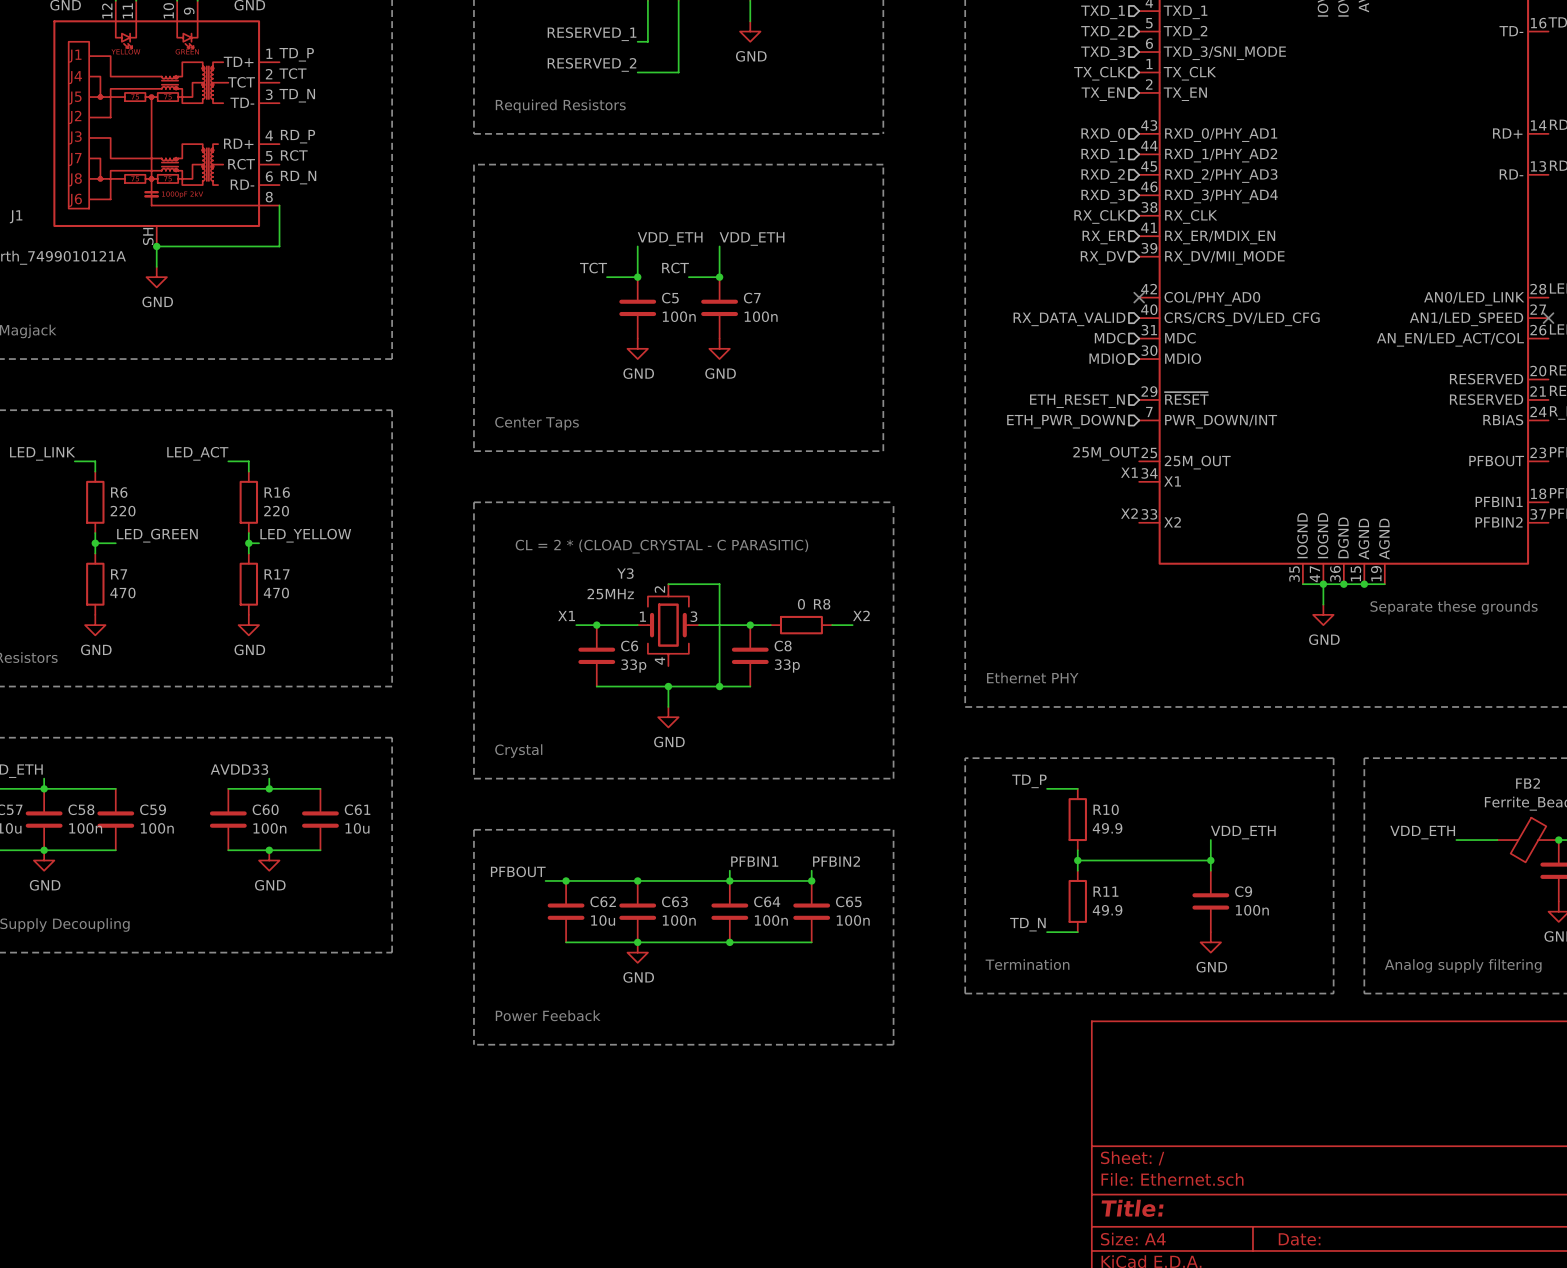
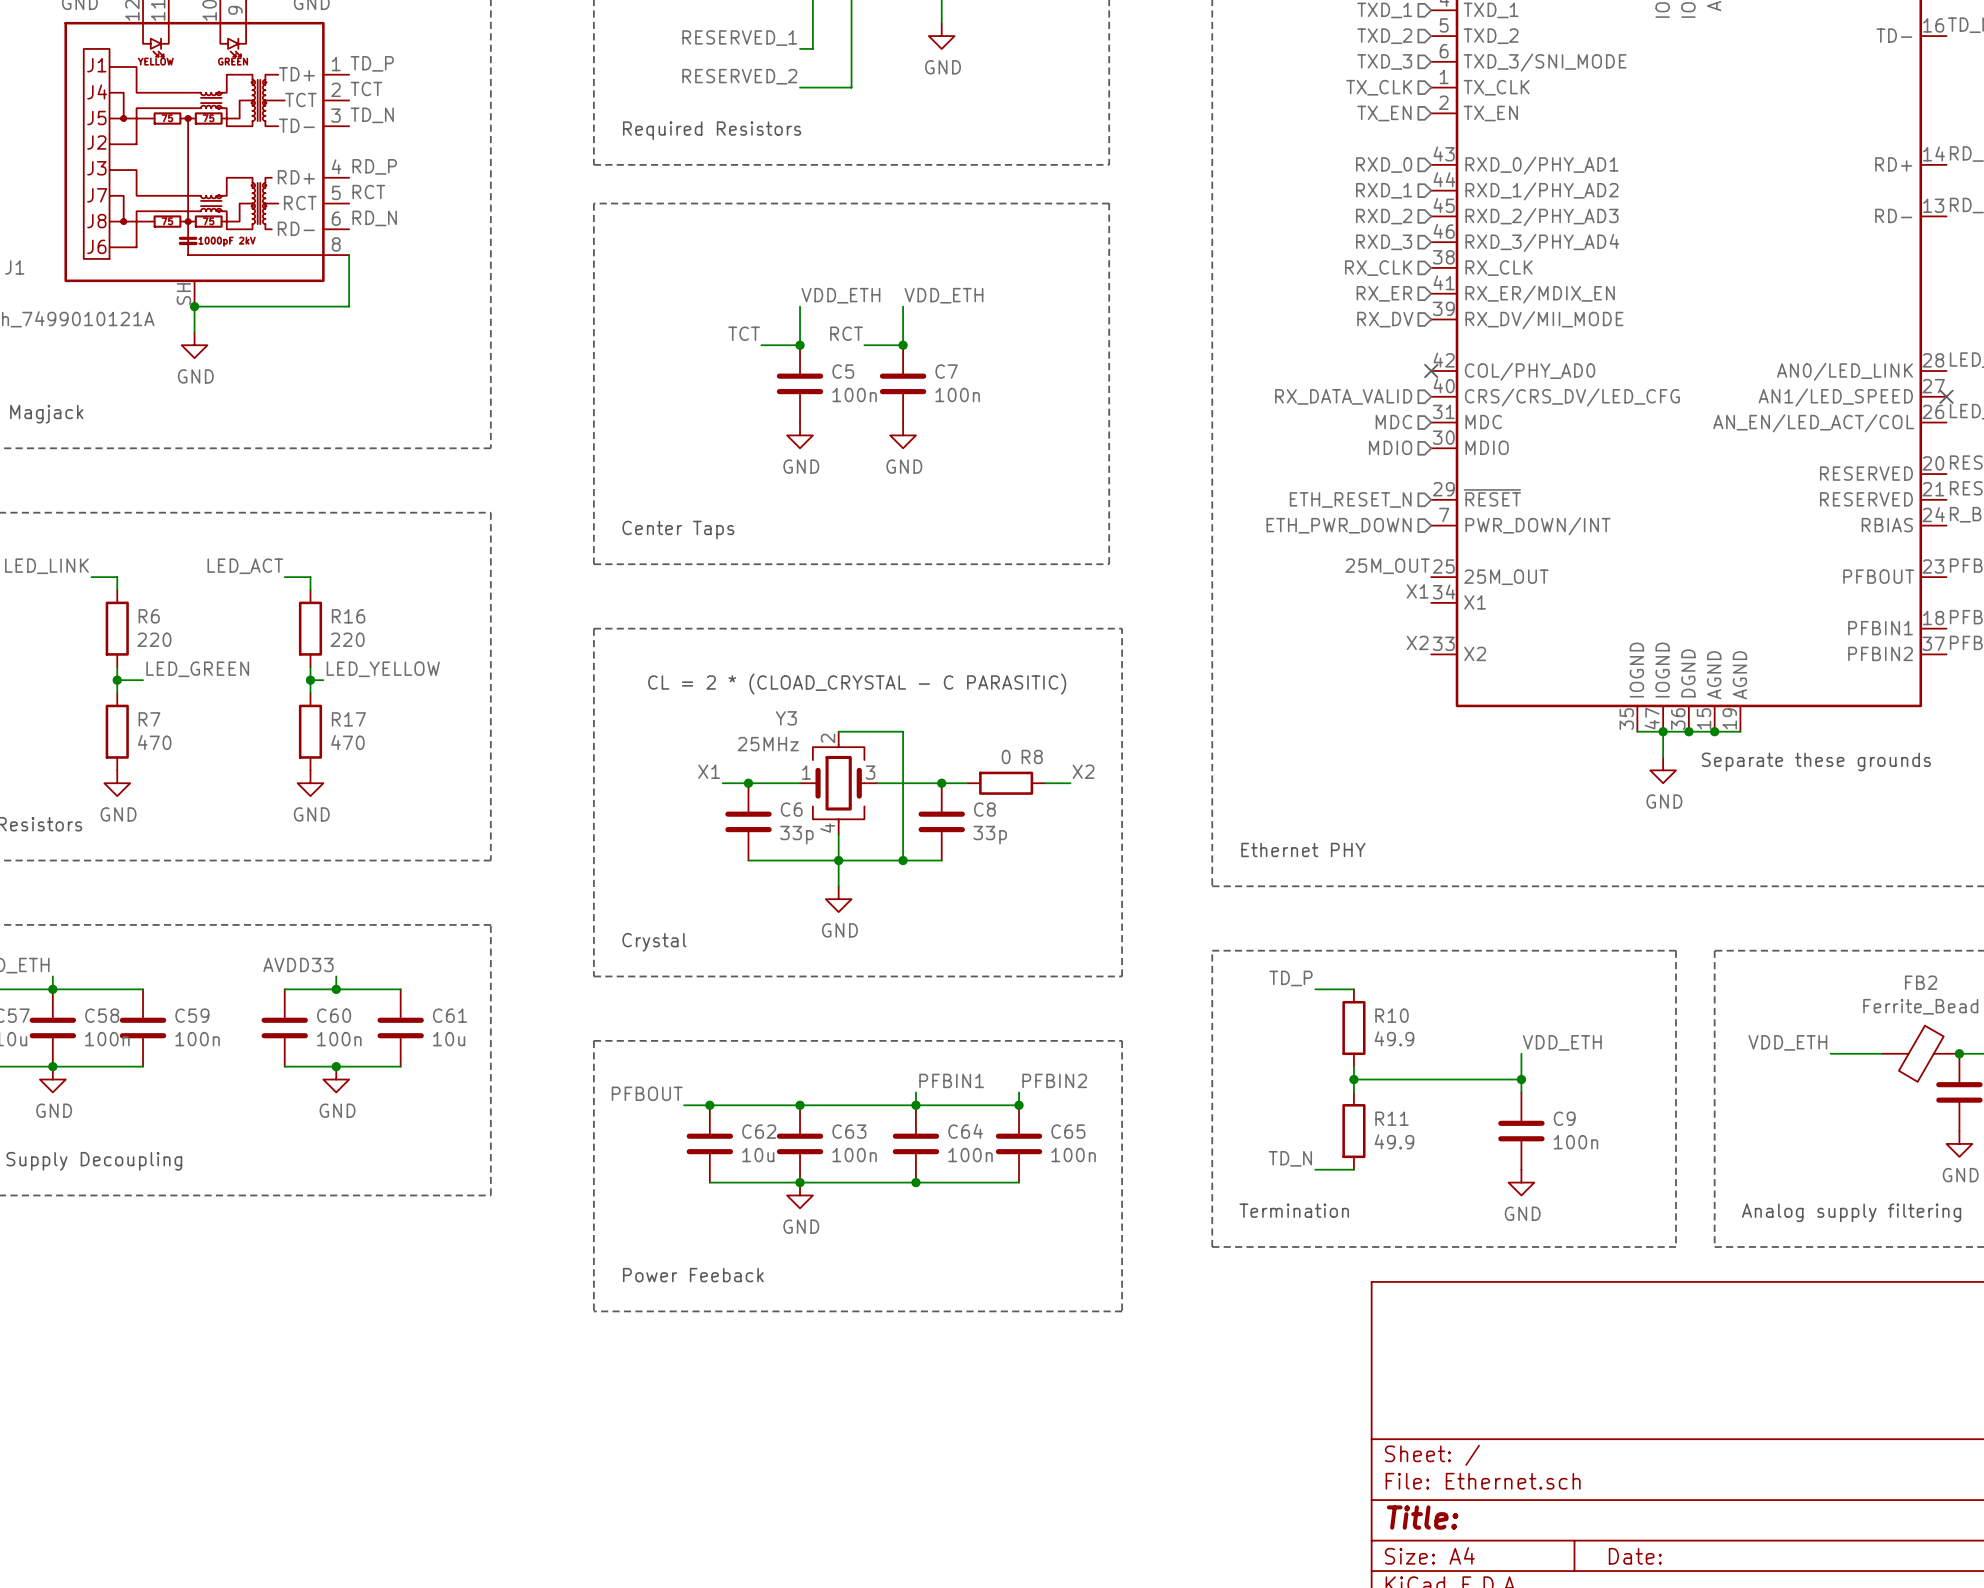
wire: none -> (838, 834) (838, 860)

